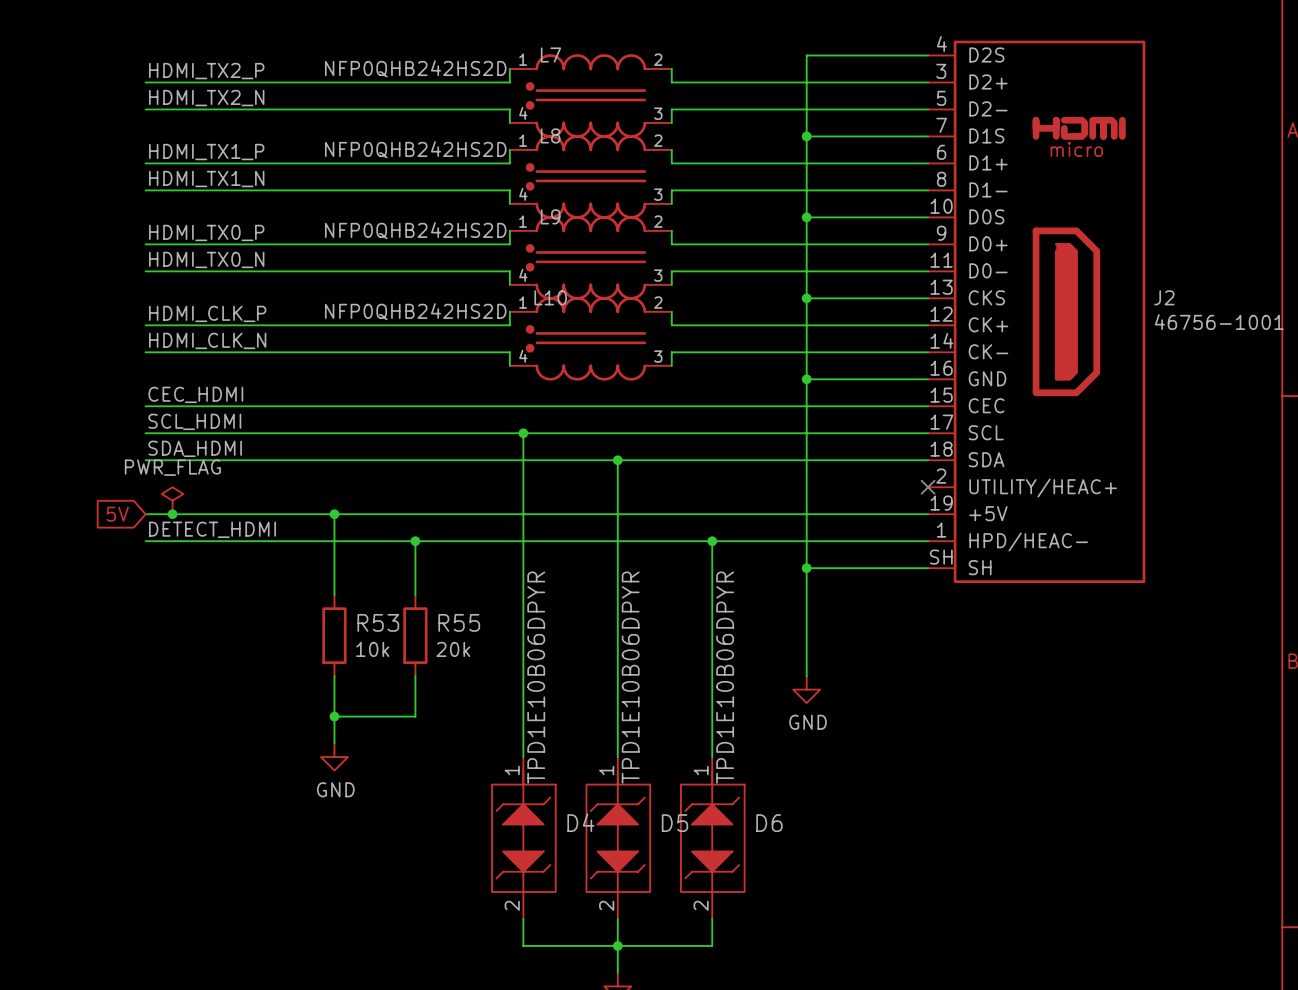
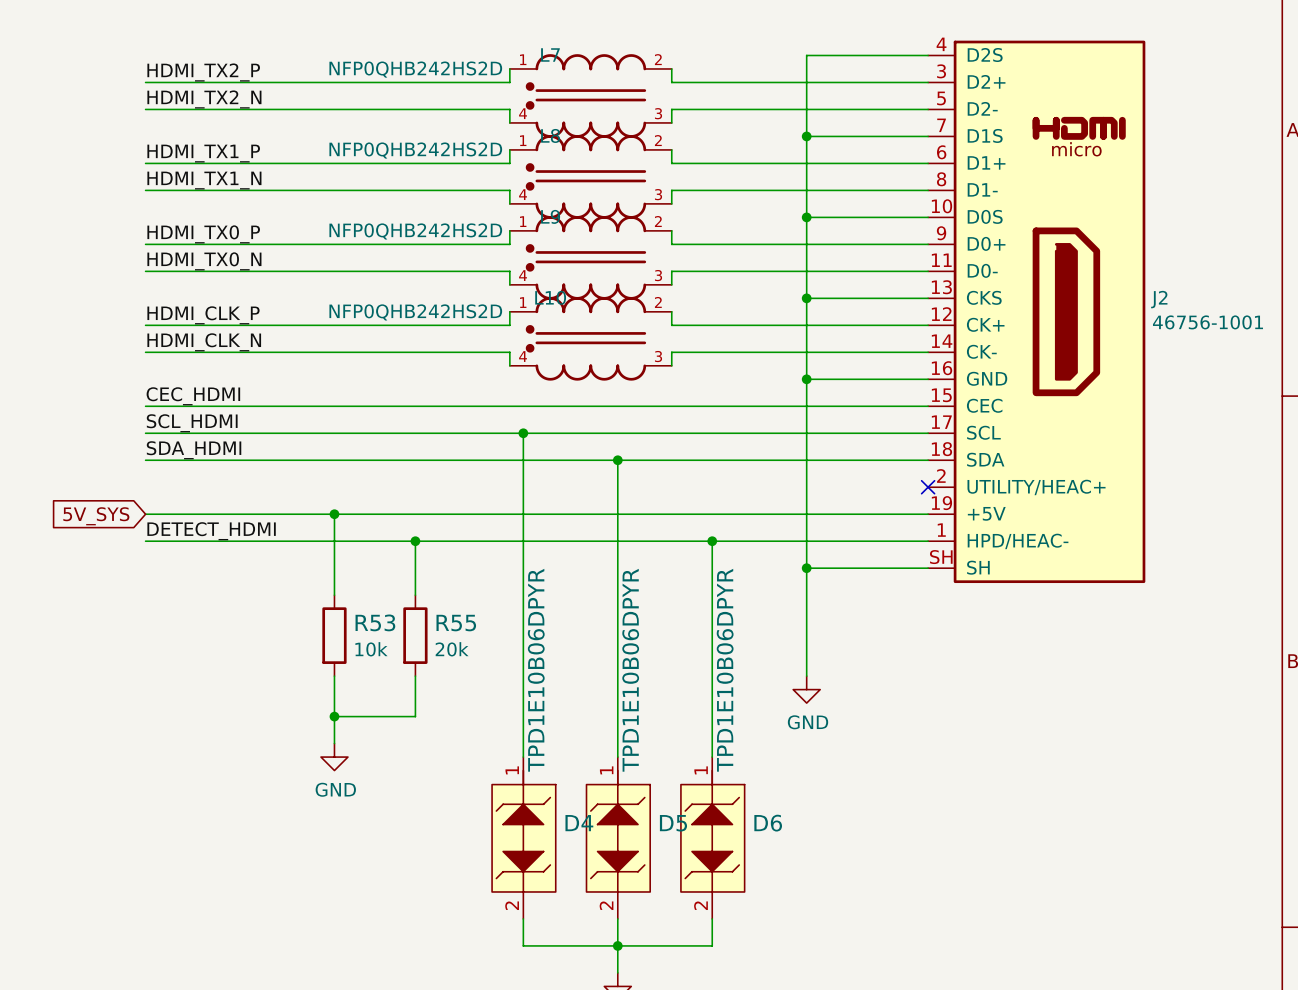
power symbol: PWR_FLAG (172, 500) -> none
global label: 5V (117, 514) -> 5V_SYS (96, 516)
junction: (172, 514) -> none

